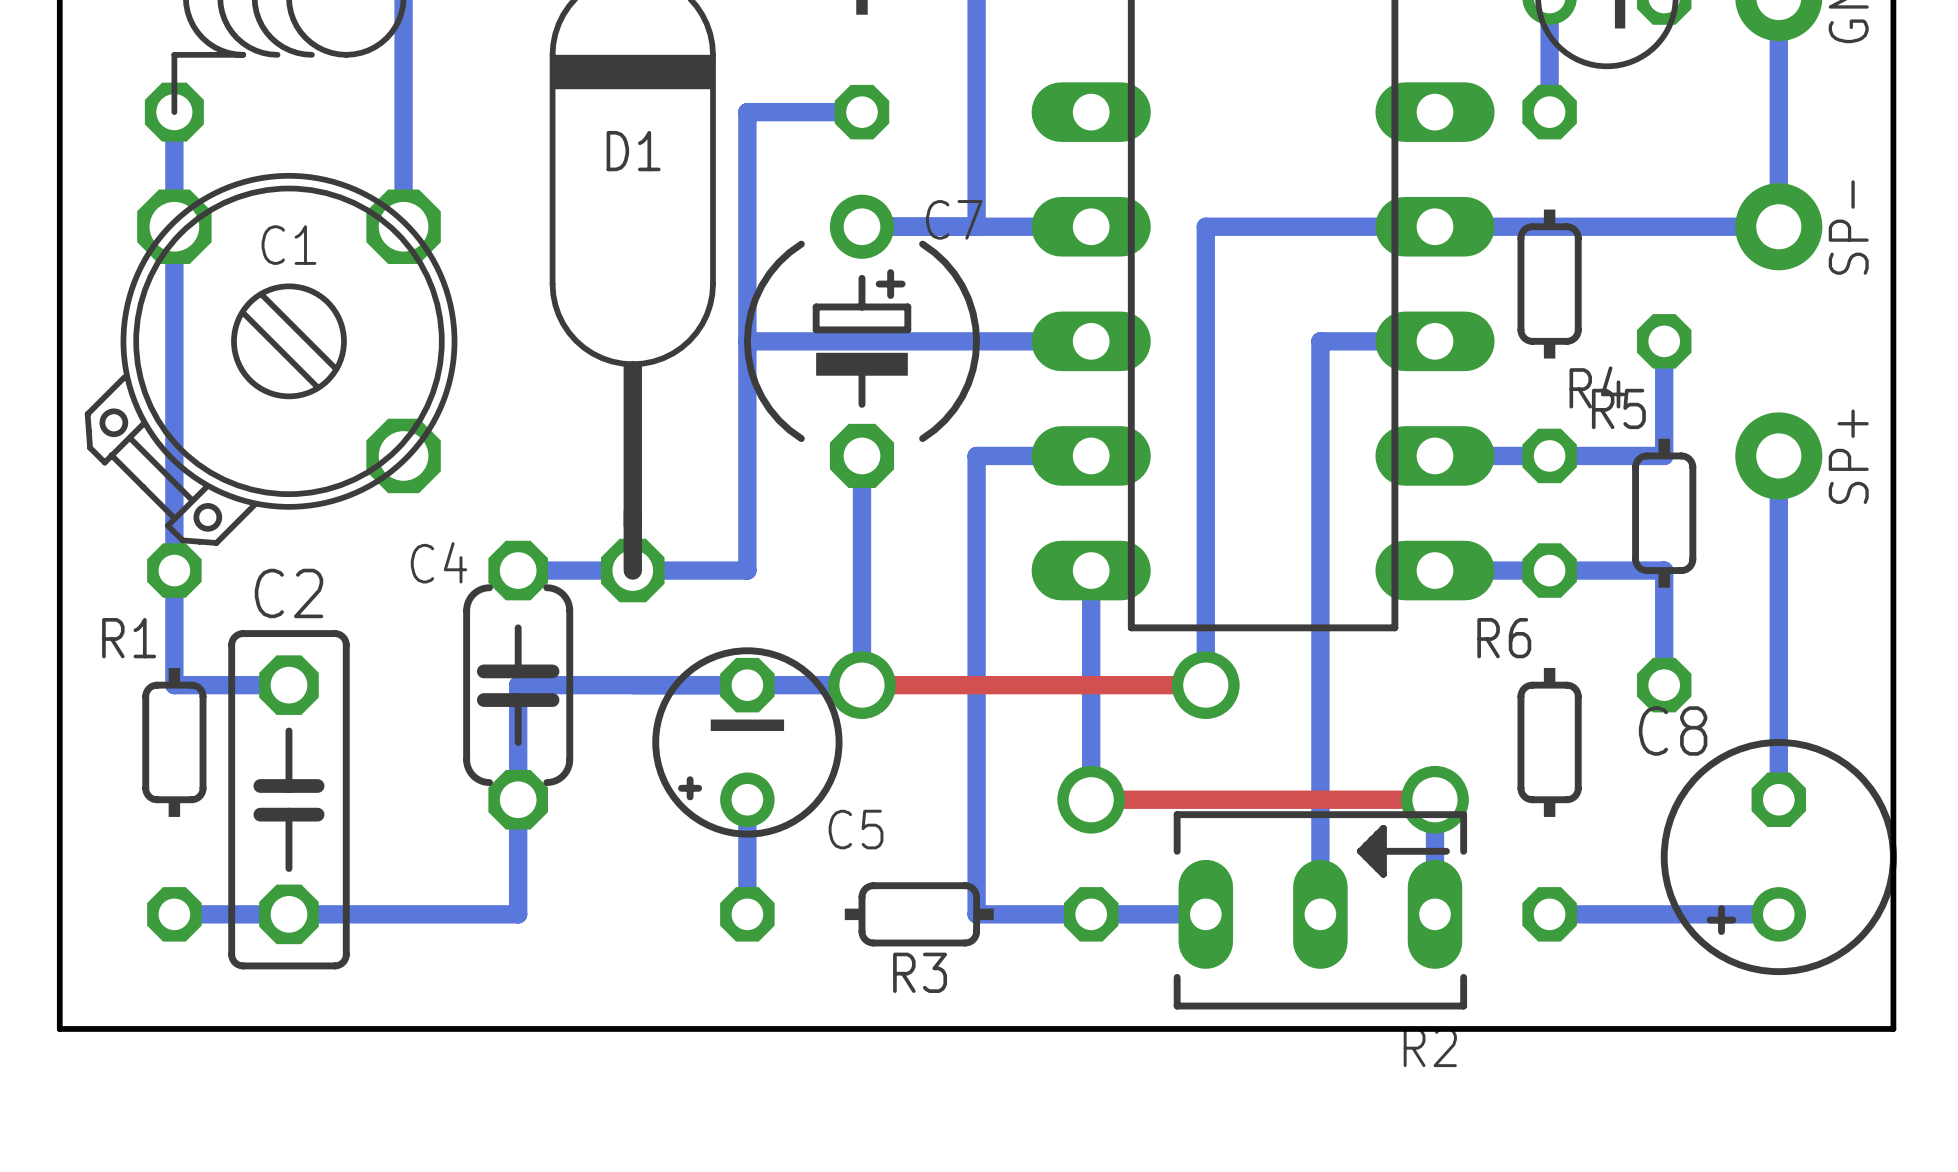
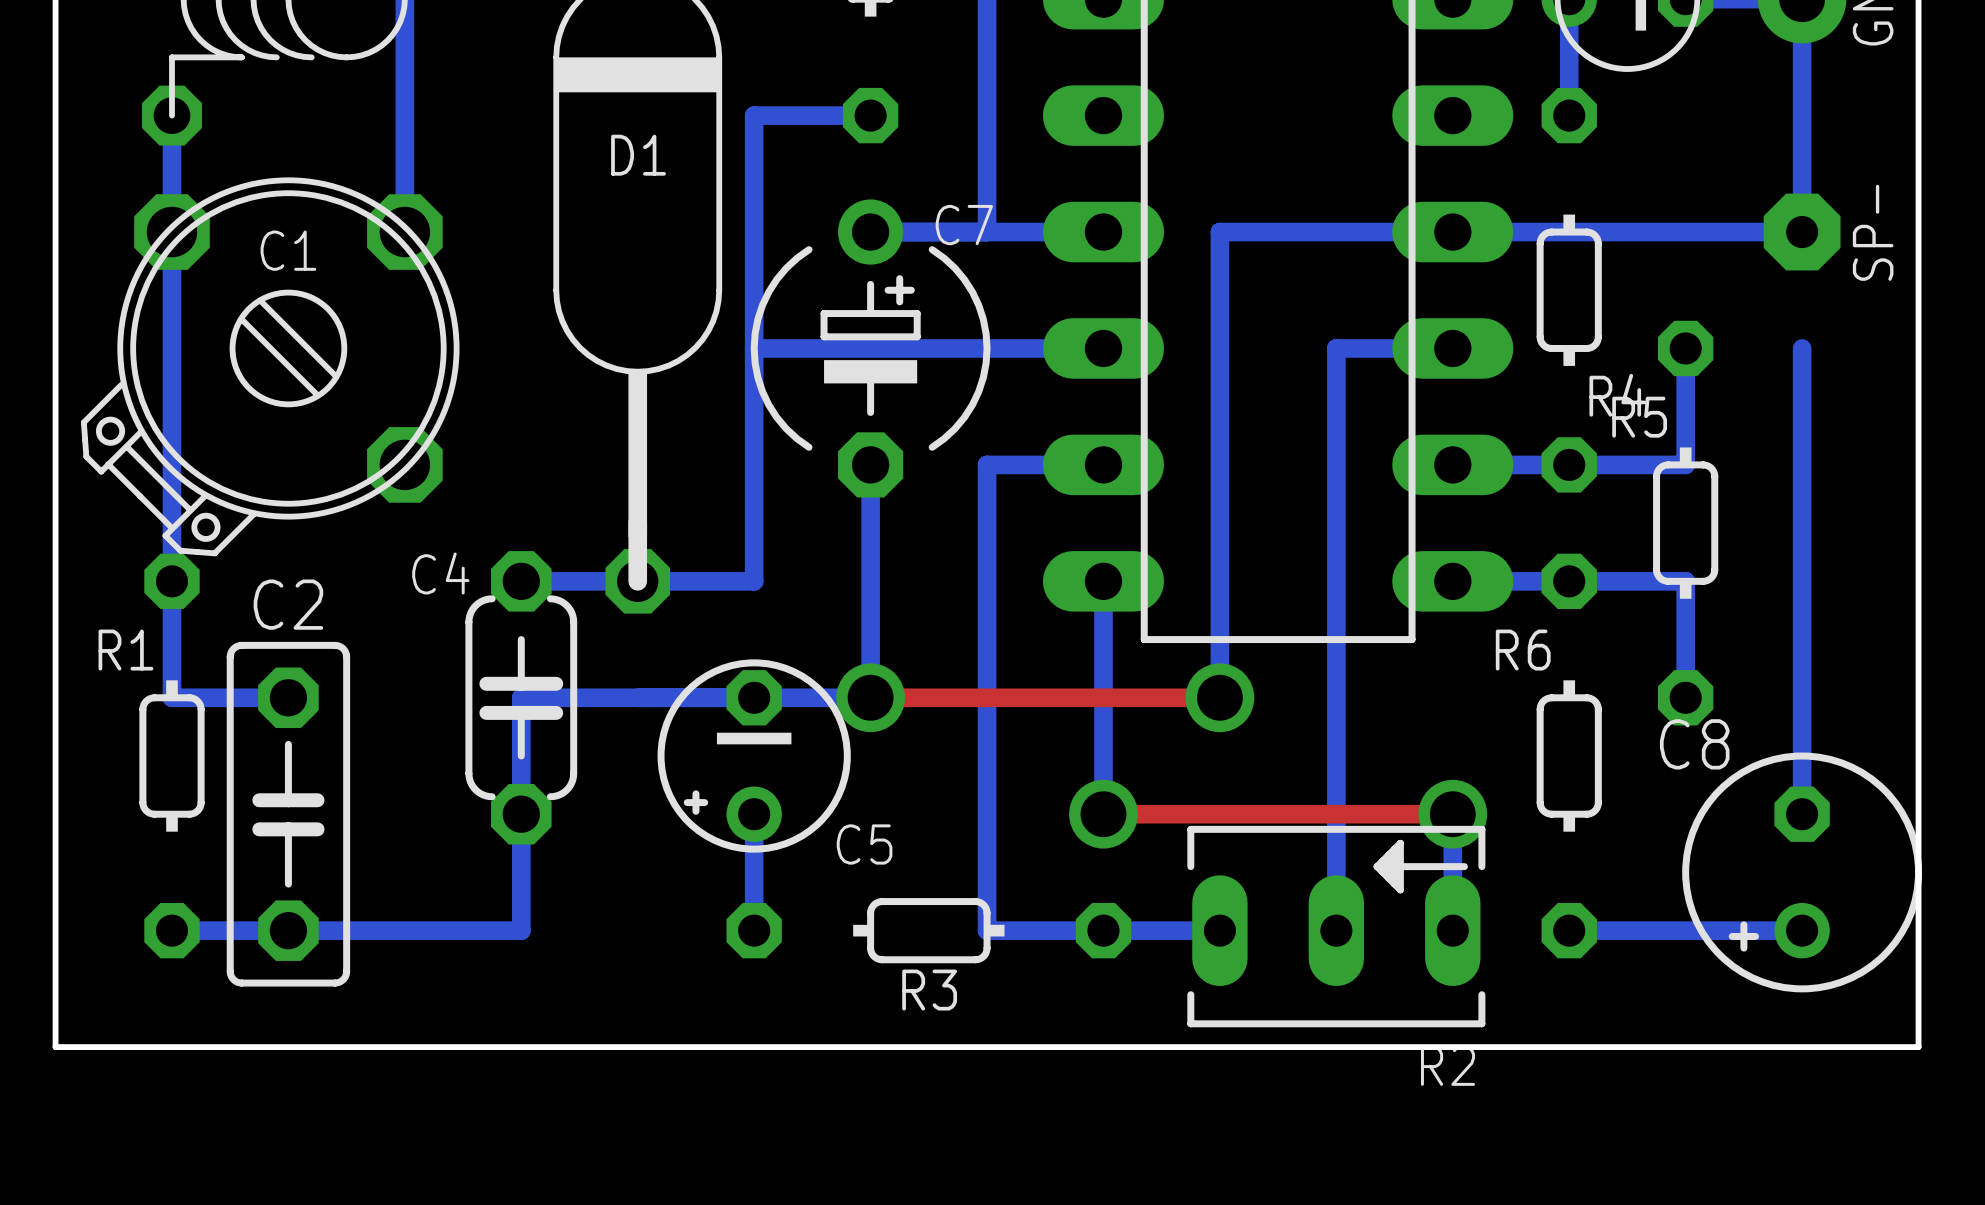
SP- footprint: [1735, 183, 1823, 271] -> [1763, 193, 1841, 271]
bottom track: none -> (1802, 348) (1802, 464)
SP+: (1778, 455) -> none

